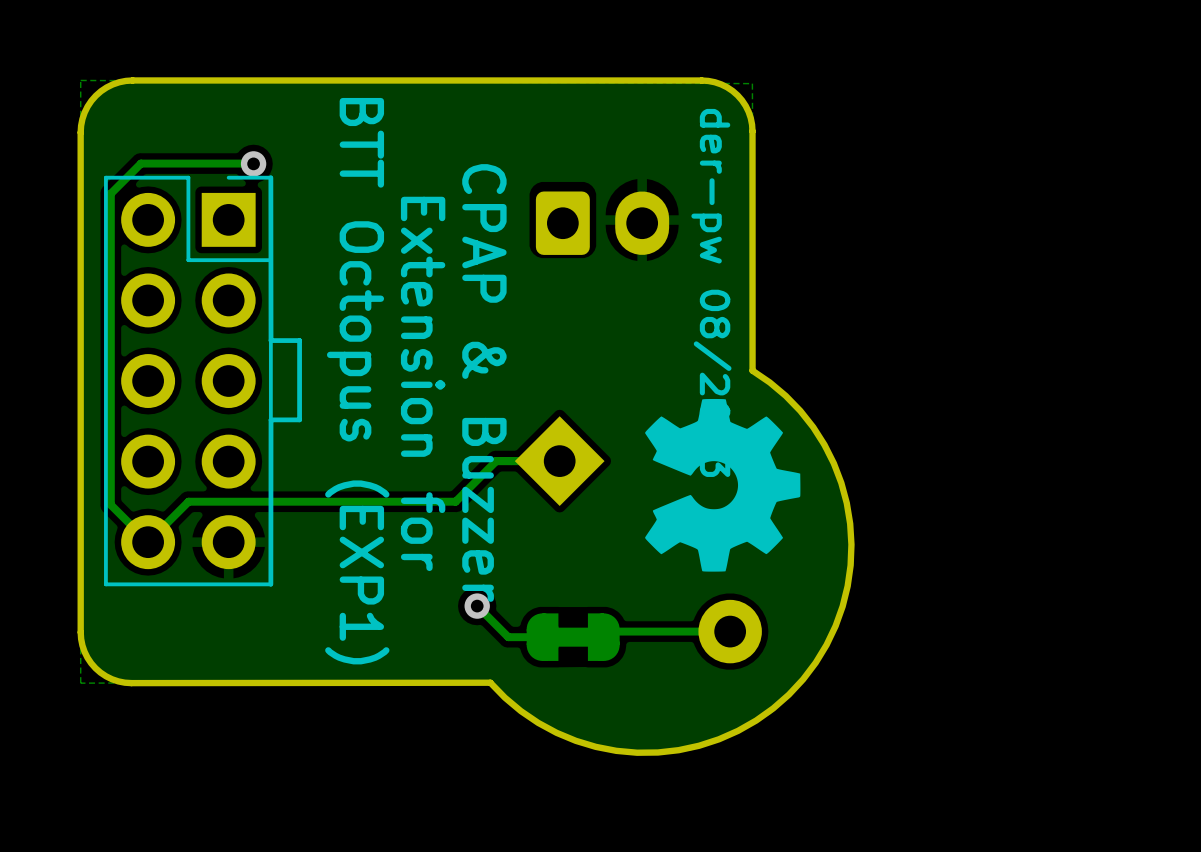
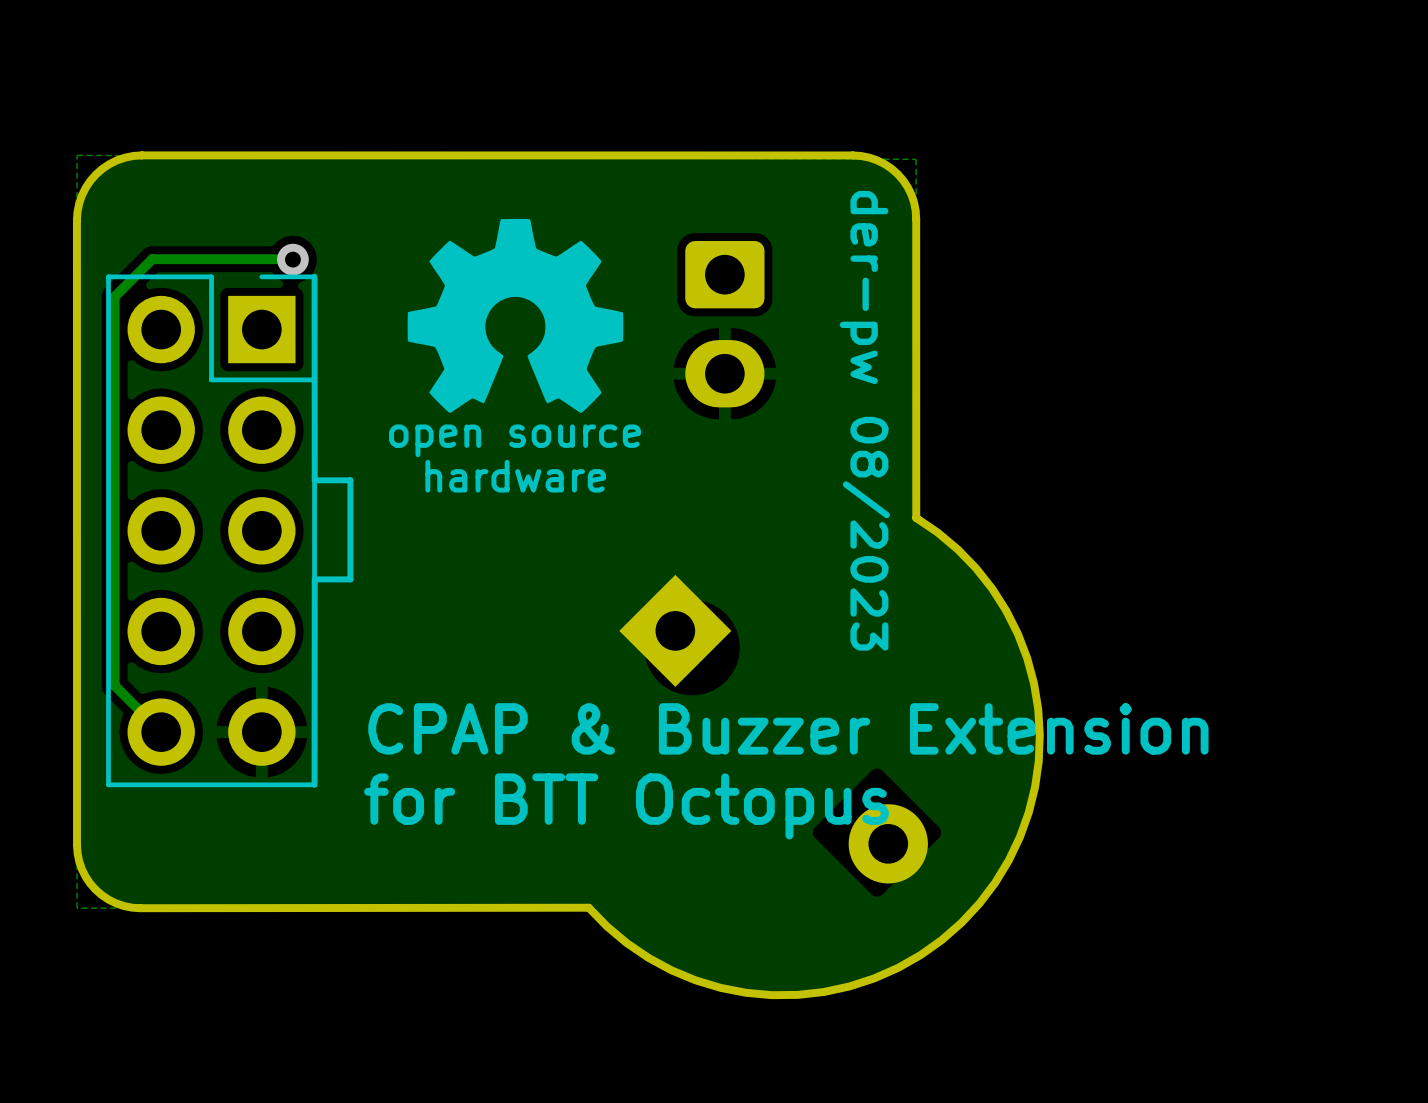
drawing: none -> [407, 218, 624, 413]
part rotation: 0° (602, 223) -> 90° clockwise (724, 324)
text: none -> open source (515, 440)
text: none -> hardware (515, 476)
text: BTT Octopus (EXP1) (357, 381) -> for BTT Octopus (626, 806)
text: CPAP & Buzzer (484, 382) -> CPAP & Buzzer Extension (788, 728)
text: Extension for (423, 383) -> none
drawing: [645, 398, 801, 572] -> none
track: (559, 461) (496, 461) (455, 501) (188, 501) (148, 542) -> none
track: (477, 606) (508, 637) (542, 637) -> none
via: (477, 606) -> none
track: (730, 631) (609, 631) (603, 637) -> none
part: (573, 637) -> none

